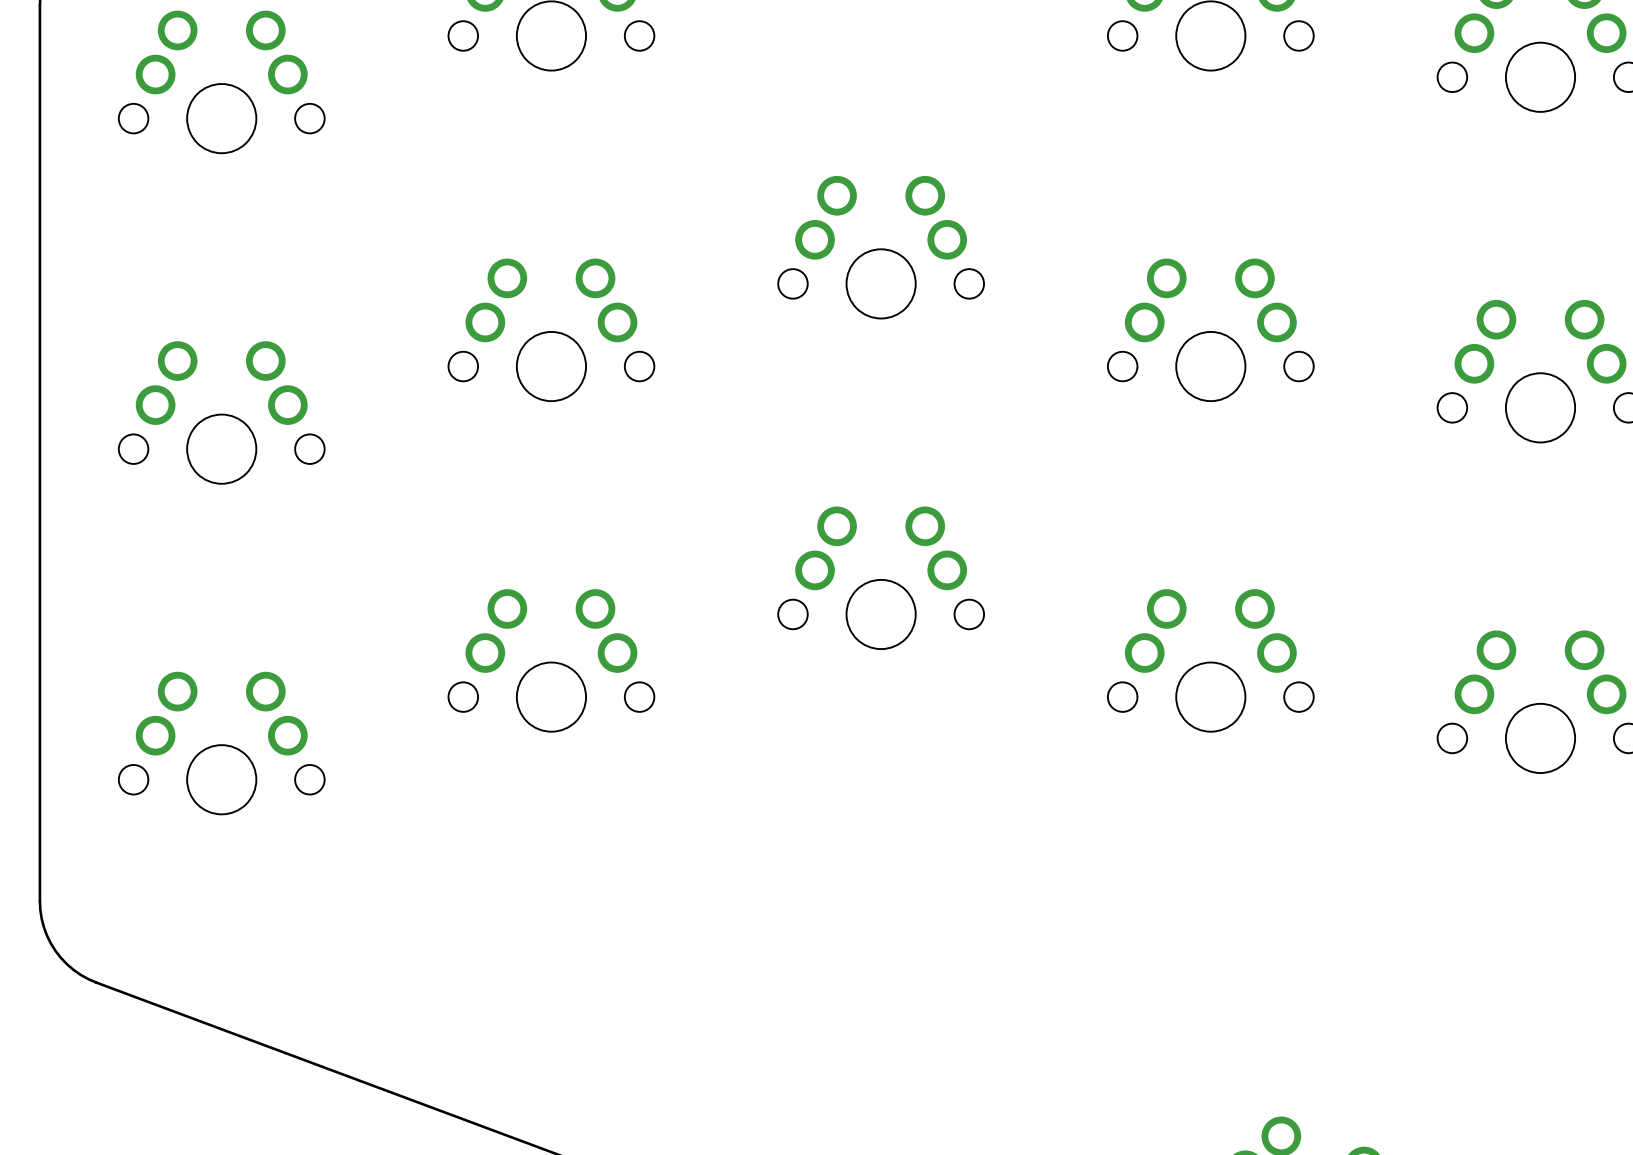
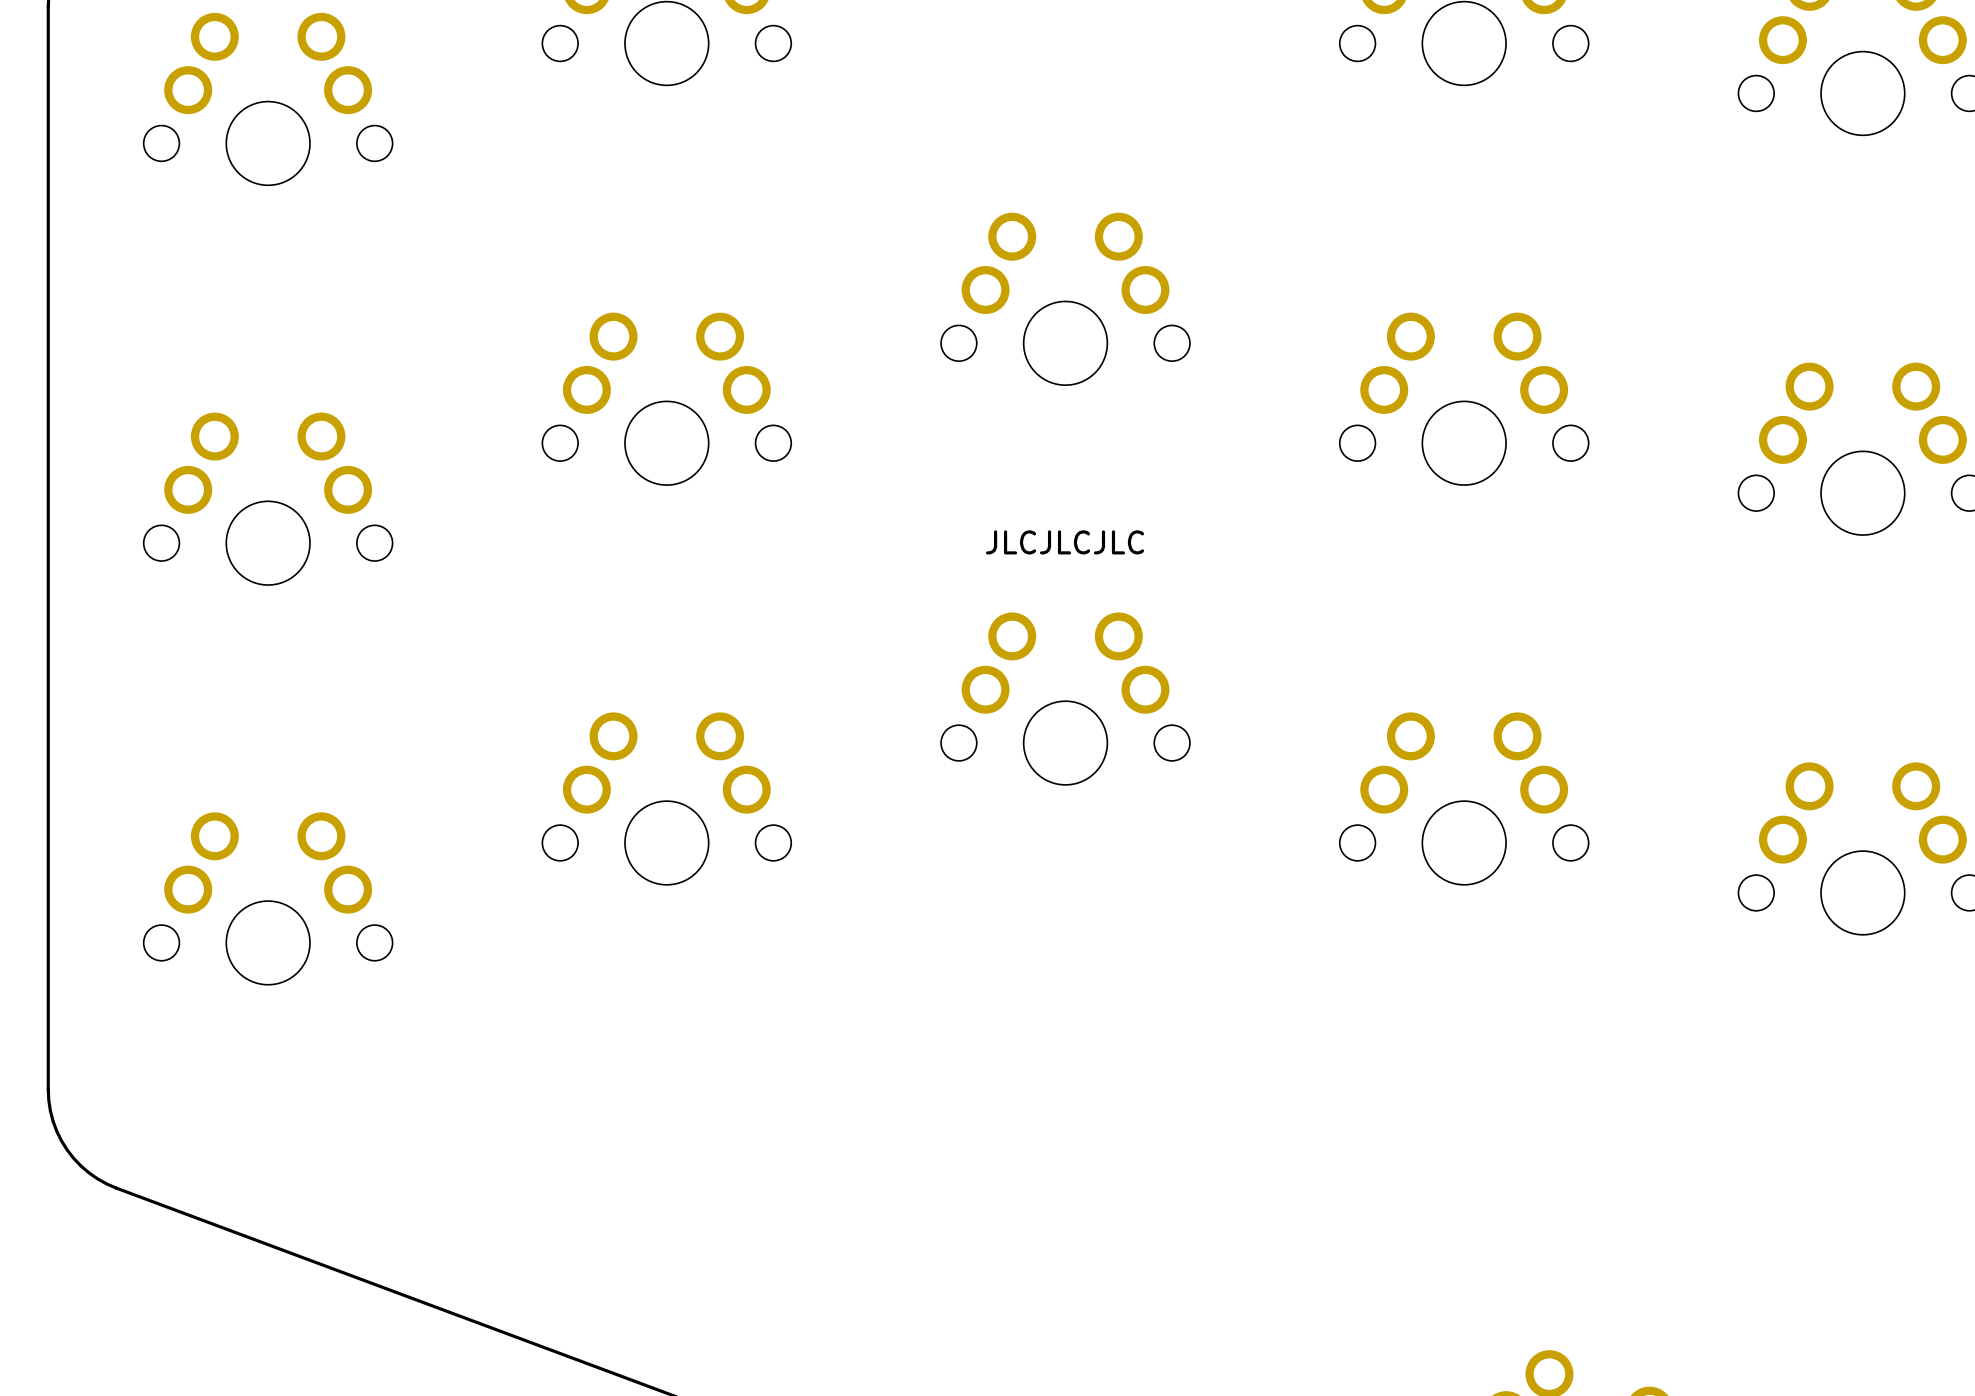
text: none -> JLCJLCJLC (1065, 542)

